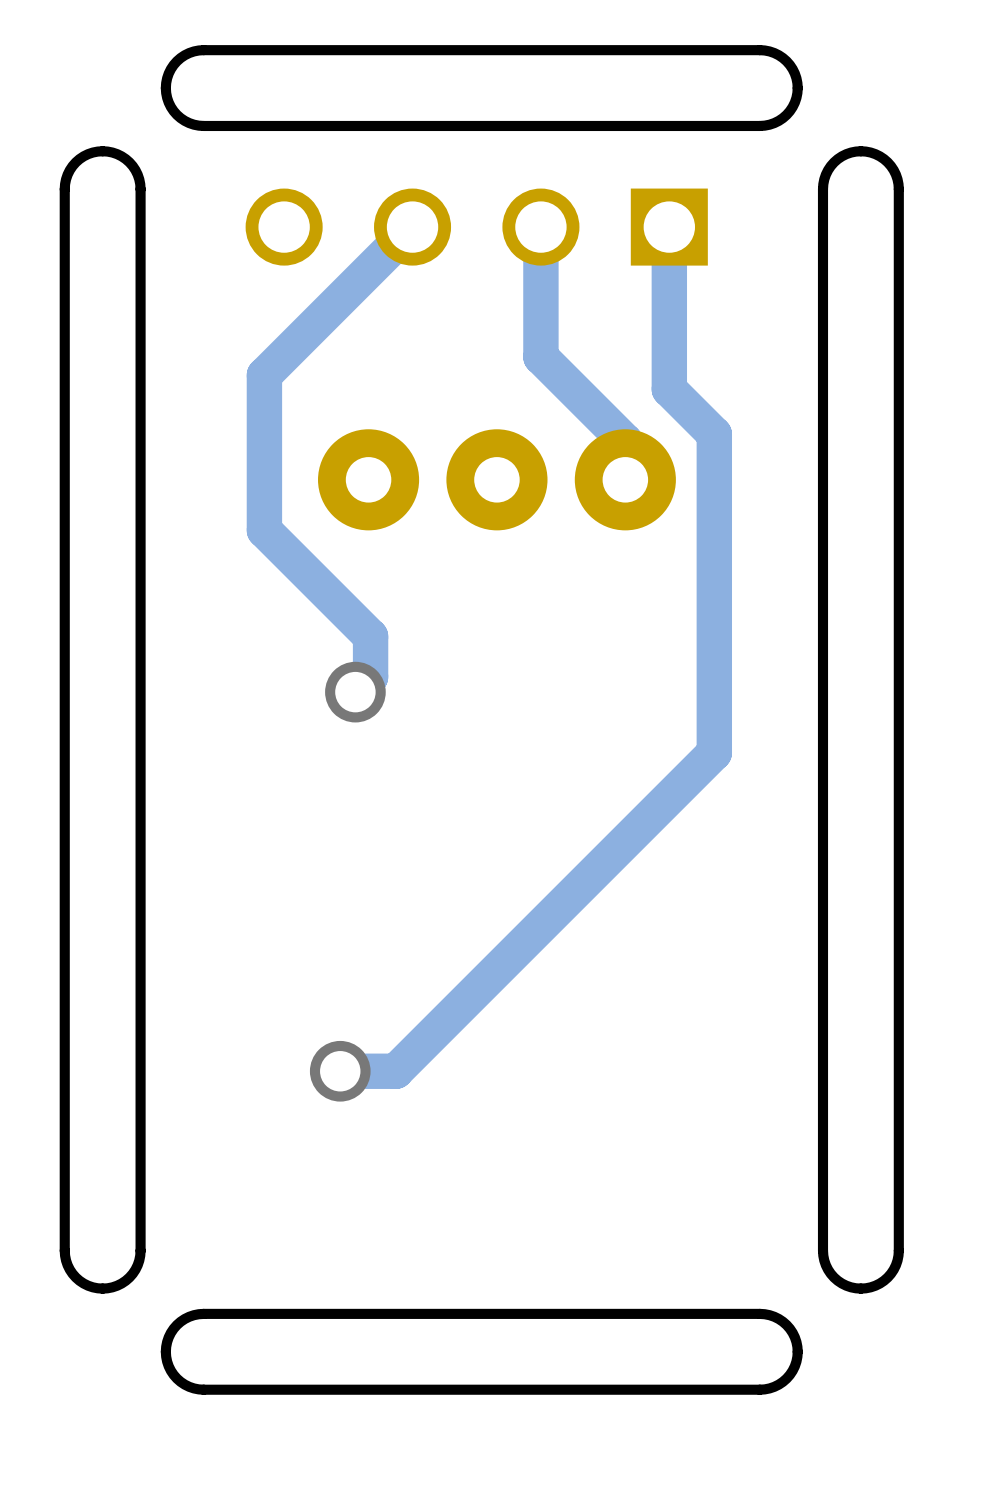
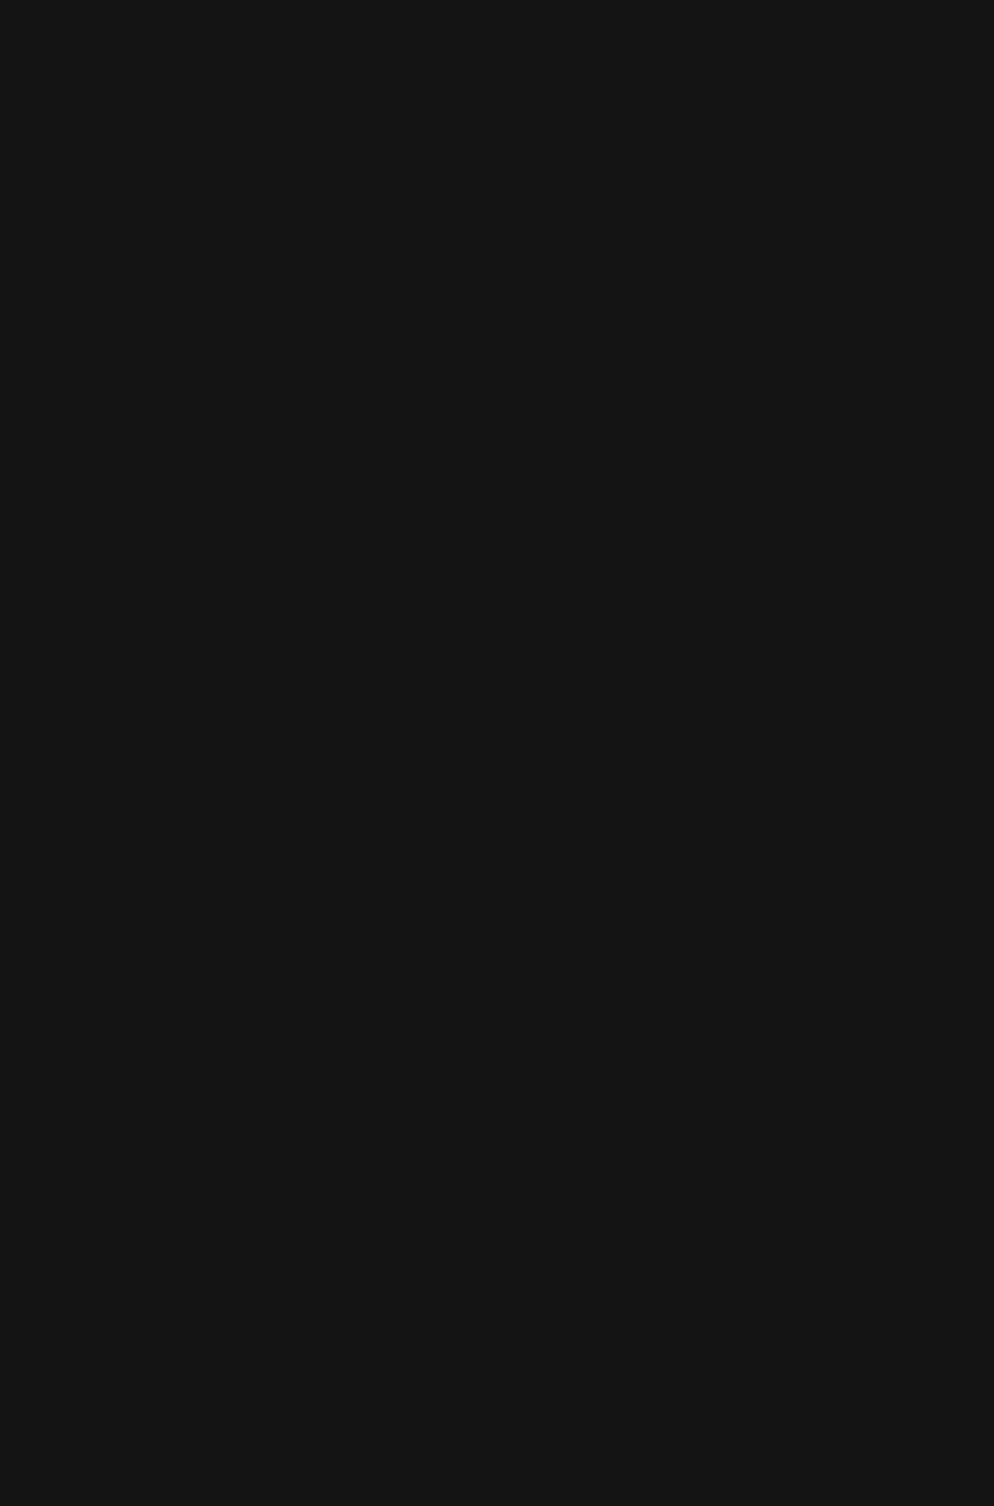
board edge: (759, 50) (198, 50) (184, 55) (173, 64) (167, 78) (166, 93) (170, 107) (176, 114) (189, 123) (203, 125) (764, 125) (778, 120) (789, 111) (796, 97) (797, 88) (794, 73) (786, 61) (774, 53) (759, 50) -> none
board edge: (102, 151) (88, 154) (75, 162) (67, 174) (64, 189) (64, 1250) (67, 1265) (75, 1277) (88, 1285) (102, 1288) (117, 1285) (129, 1277) (137, 1265) (140, 1250) (140, 189) (137, 174) (129, 162) (117, 154) (102, 151) -> none
board edge: (860, 151) (846, 154) (834, 162) (825, 174) (822, 189) (822, 1250) (825, 1265) (834, 1277) (846, 1285) (860, 1288) (875, 1285) (887, 1277) (895, 1265) (898, 1250) (898, 189) (895, 174) (887, 162) (875, 154) (860, 151) -> none
track: (412, 227) (264, 375) (264, 530) (370, 636) (370, 676) (355, 692) -> none
part: (476, 227) -> none
track: (540, 227) (540, 356) (625, 441) (625, 479) -> none
track: (669, 227) (669, 389) (714, 434) (714, 752) (395, 1071) (340, 1071) -> none
part: (496, 479) -> none
via: (355, 692) -> none
via: (340, 1071) -> none
board edge: (759, 1313) (198, 1314) (184, 1318) (173, 1328) (167, 1341) (166, 1356) (170, 1370) (176, 1378) (189, 1386) (203, 1389) (764, 1389) (778, 1384) (789, 1374) (796, 1361) (797, 1351) (794, 1337) (786, 1325) (774, 1316) (759, 1313) -> none

